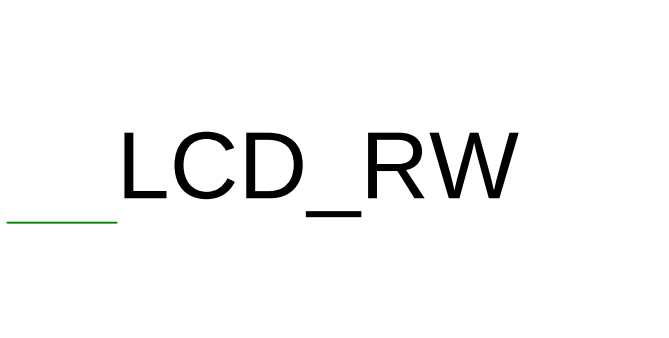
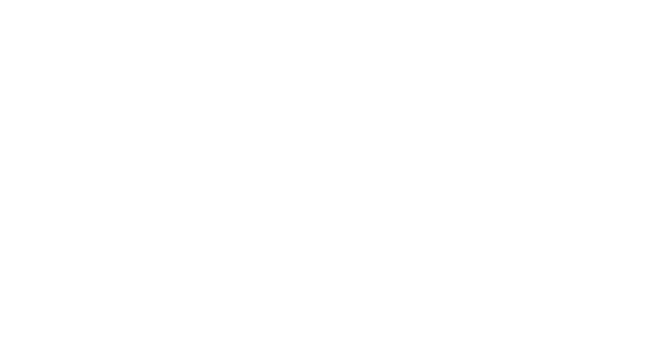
label: LCD_RW (321, 174) -> none
wire: (7, 222) (116, 222) -> none

